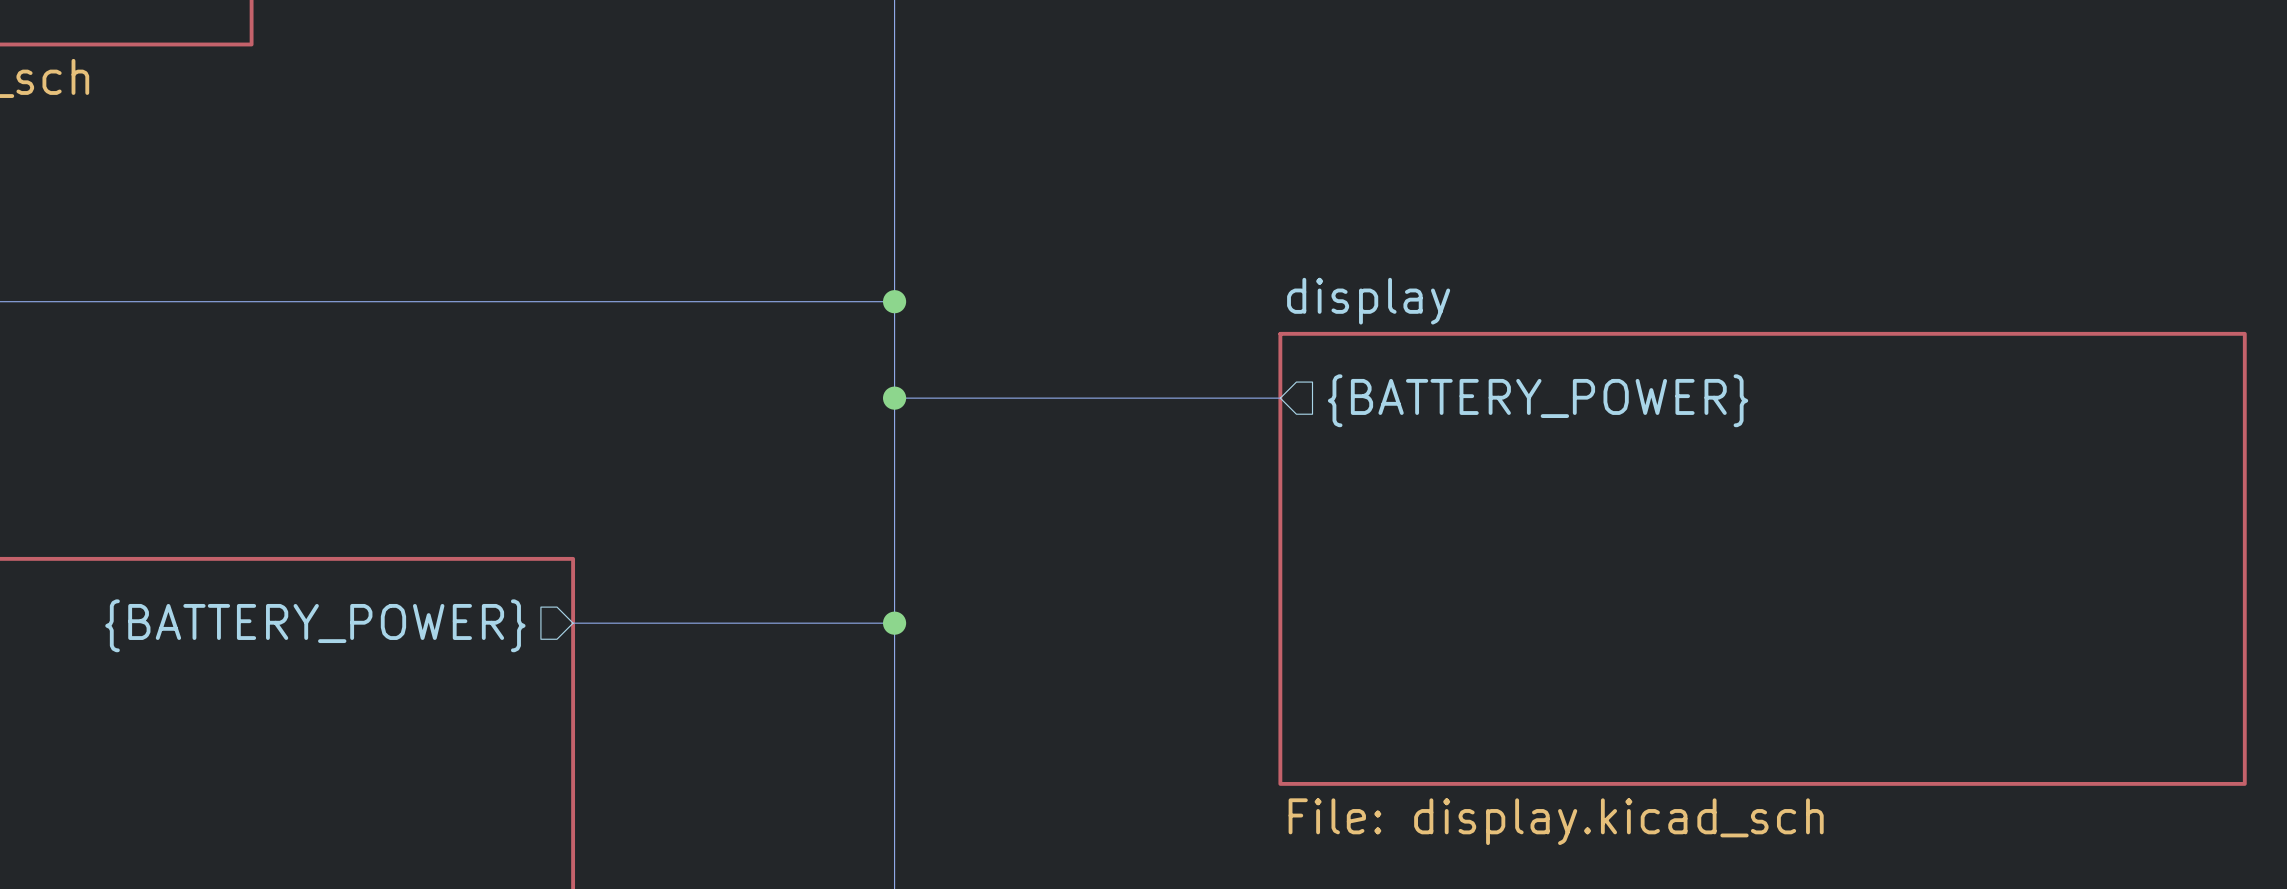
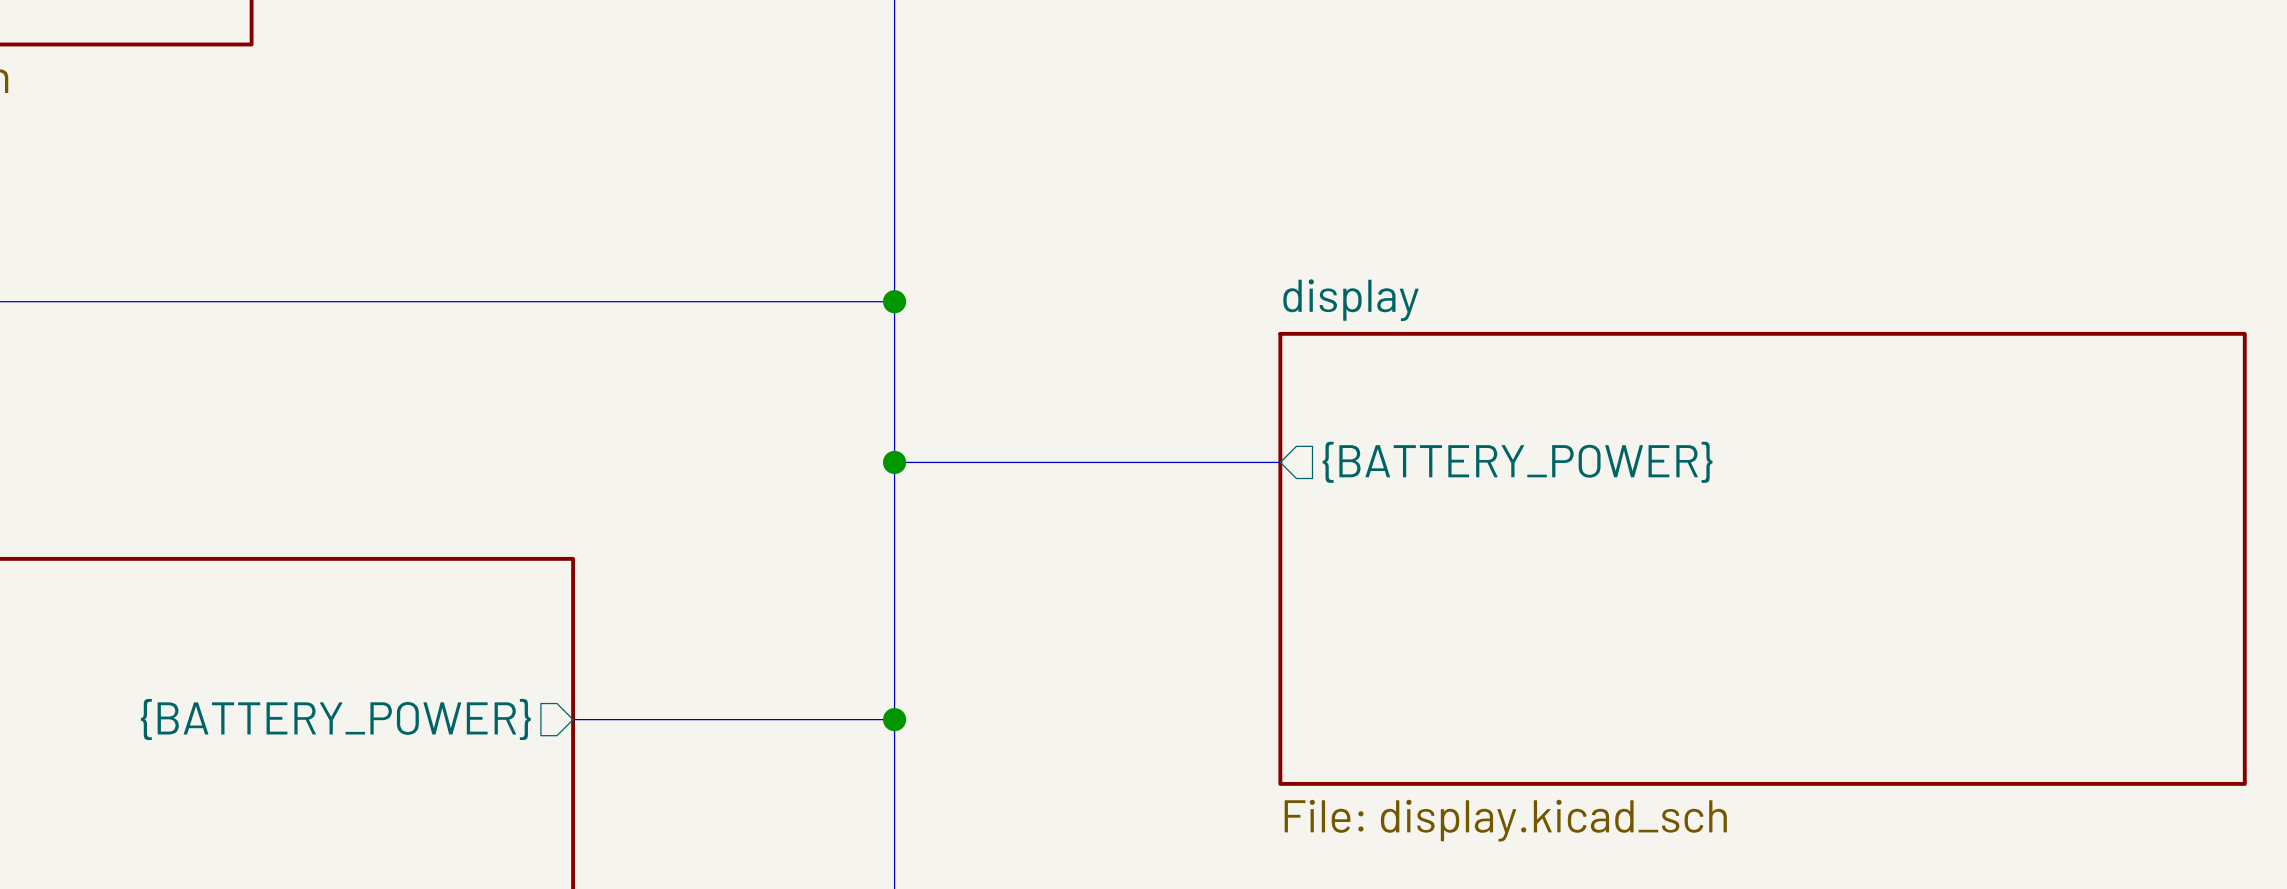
bus: (894, 398) (1280, 398) -> (894, 462) (1280, 462)
junction position: (894, 398) -> (894, 462)
sheet pin position: {BATTERY_POWER} (1538, 400) -> {BATTERY_POWER} (1517, 462)
bus: (573, 623) (894, 623) -> (573, 719) (894, 719)
junction: (894, 623) -> none
sheet pin position: {BATTERY_POWER} (315, 625) -> {BATTERY_POWER} (335, 719)
junction: none -> (894, 719)

